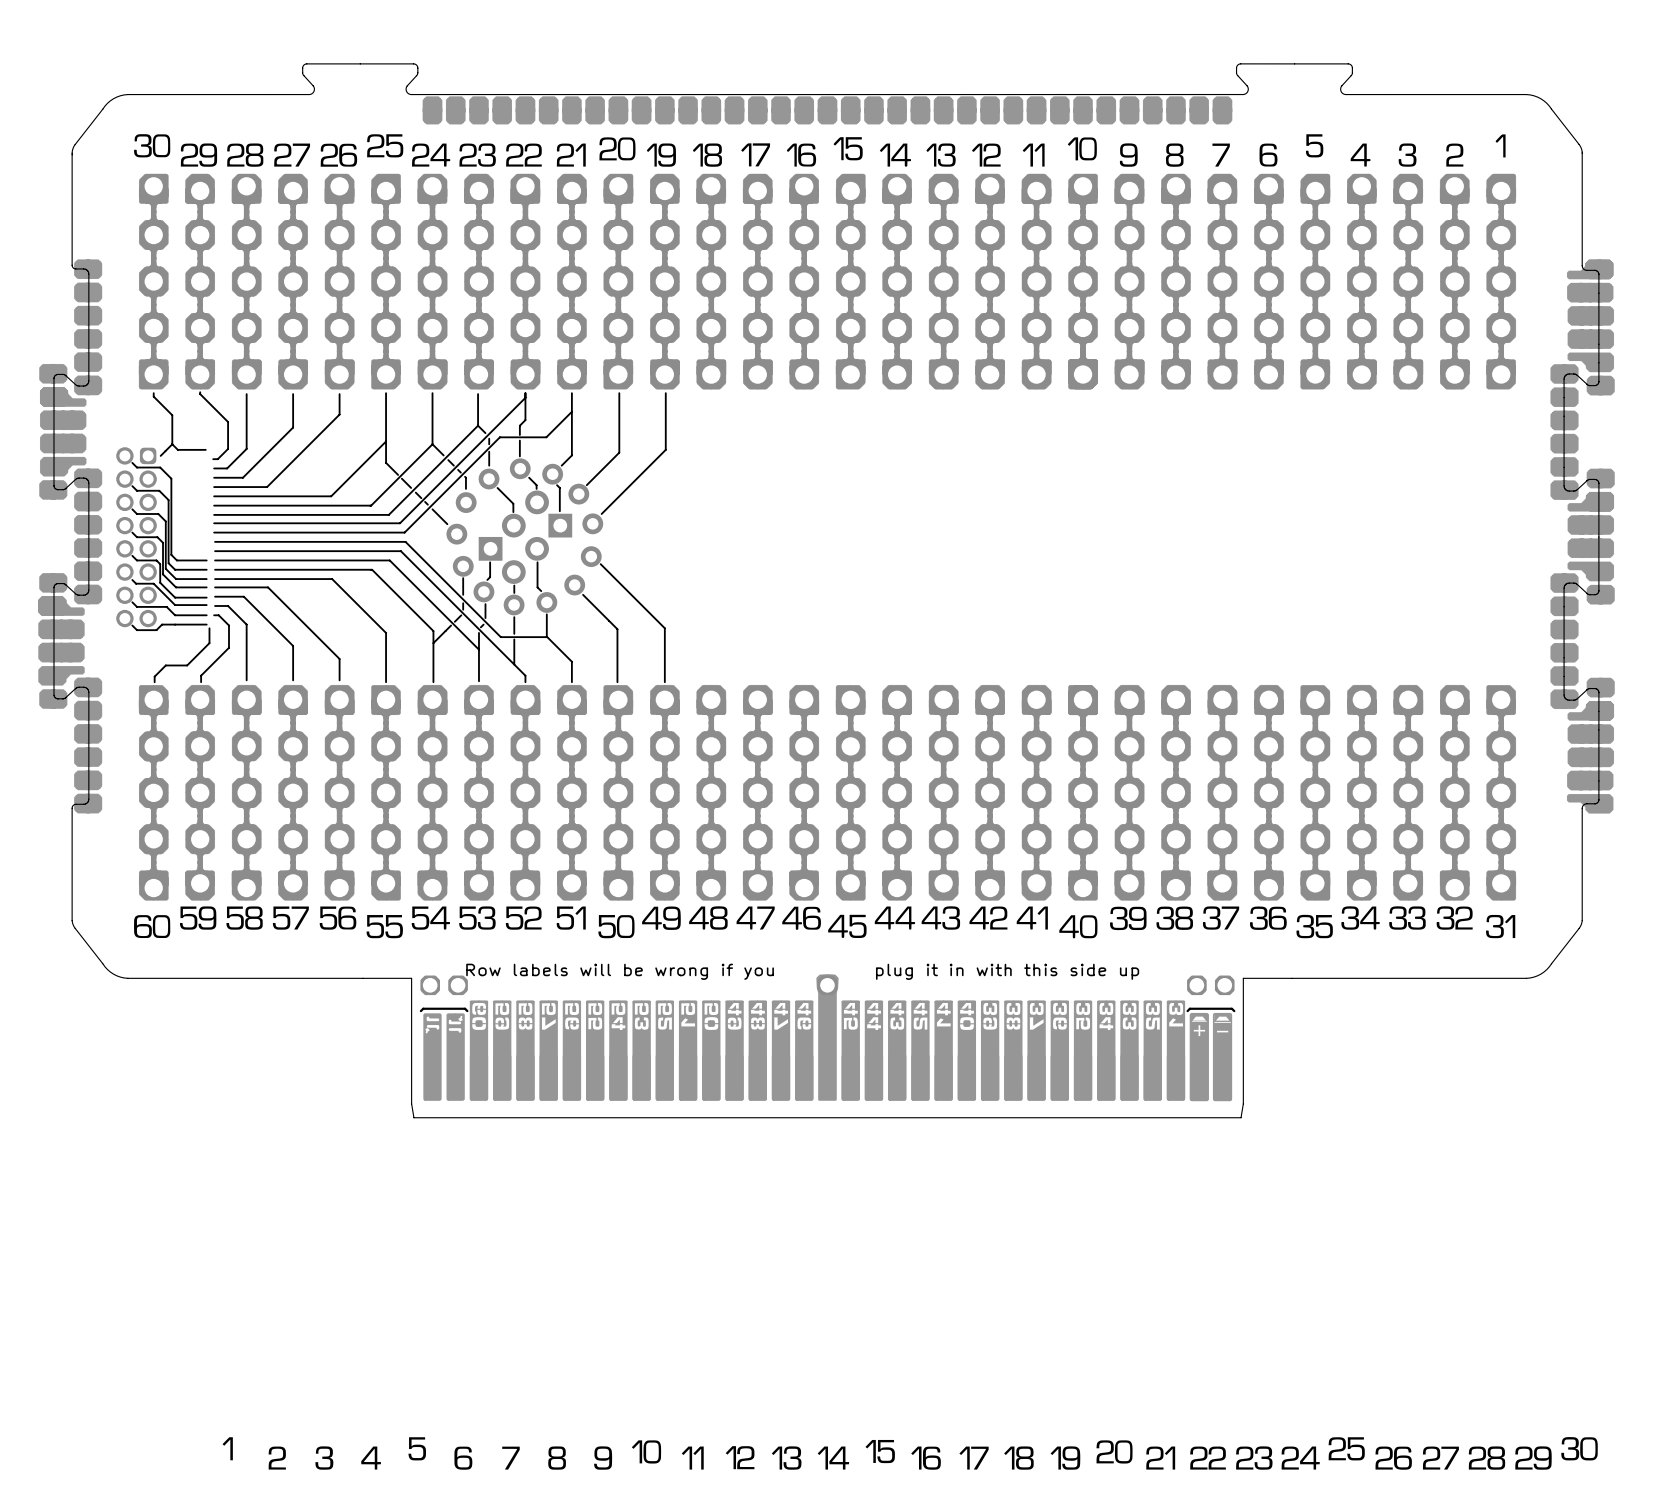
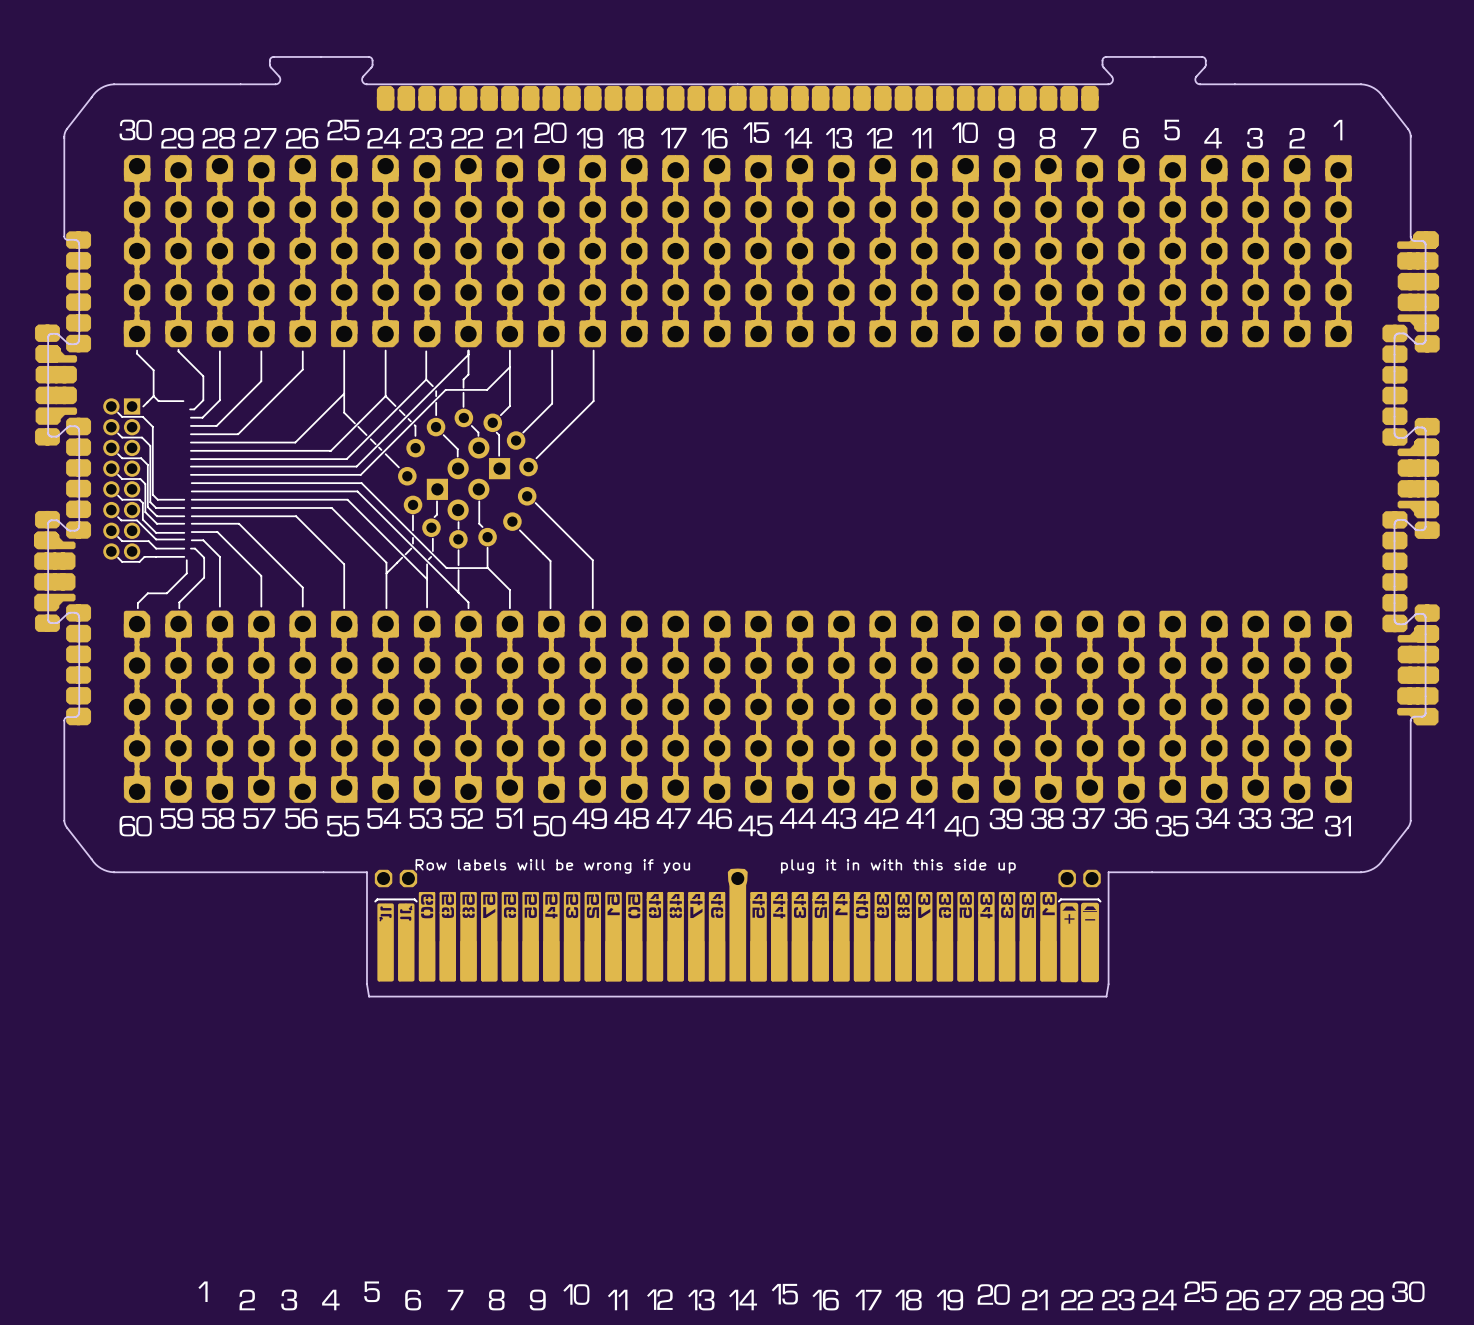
part footprint: [116, 447, 157, 628] -> [103, 398, 141, 560]

